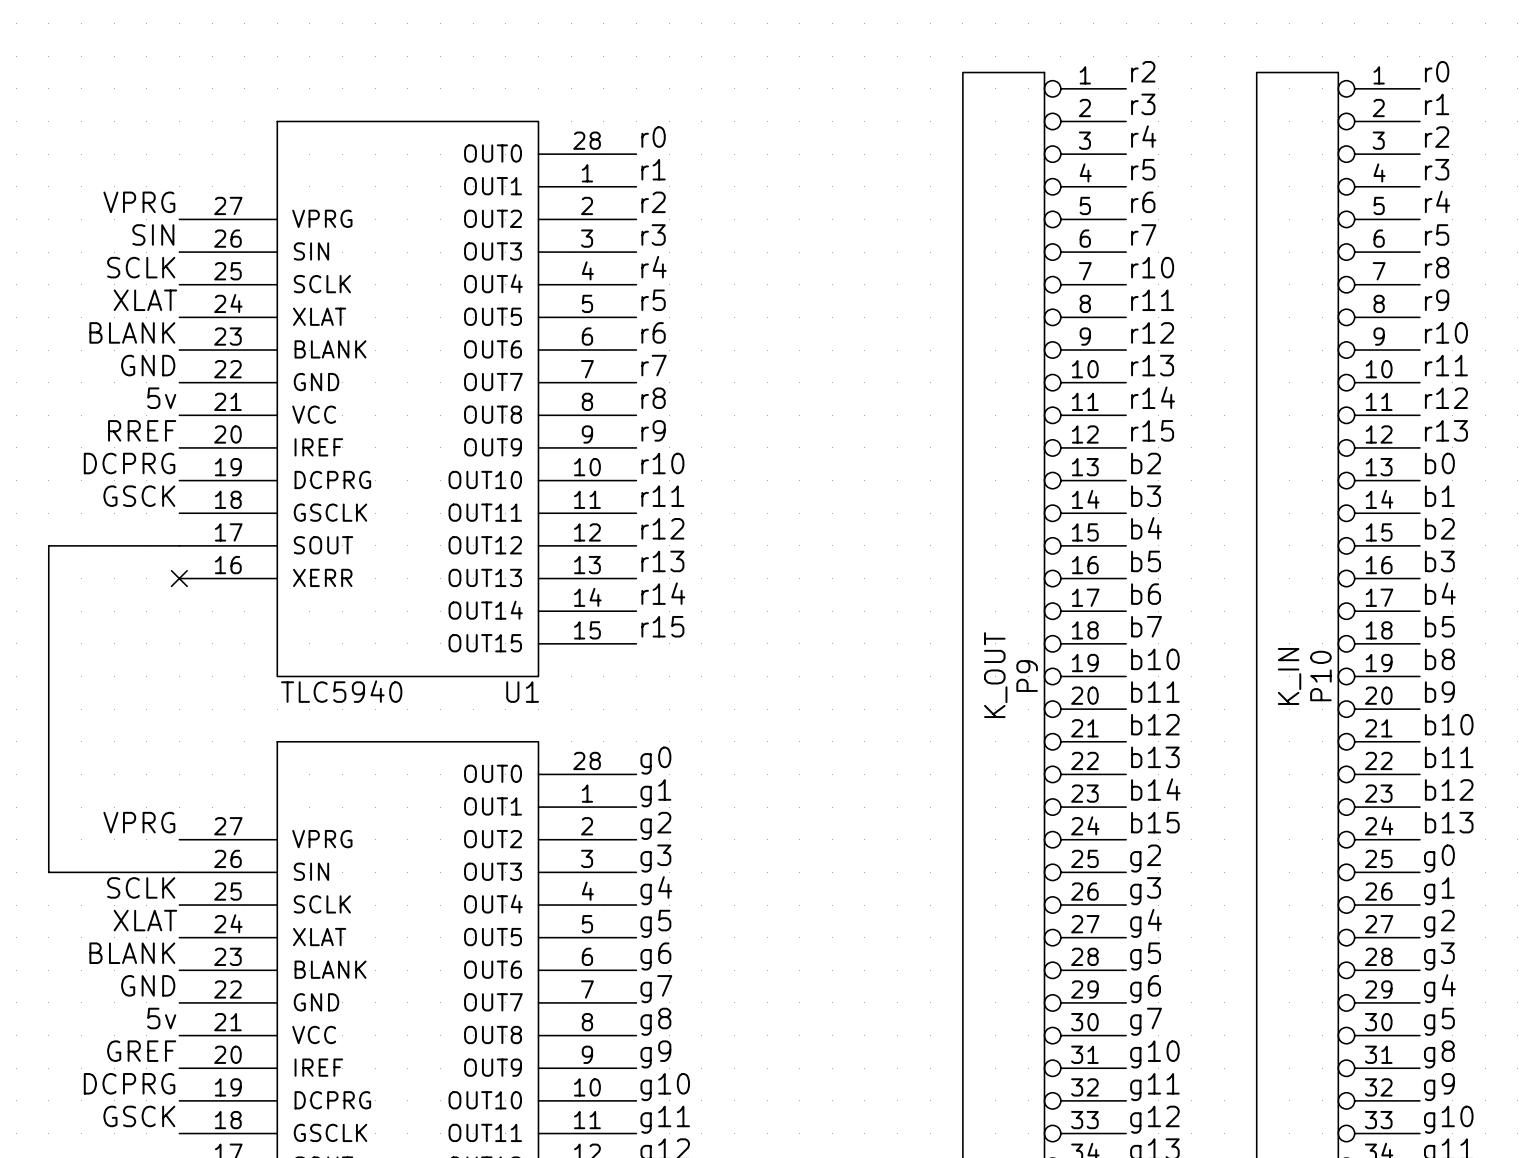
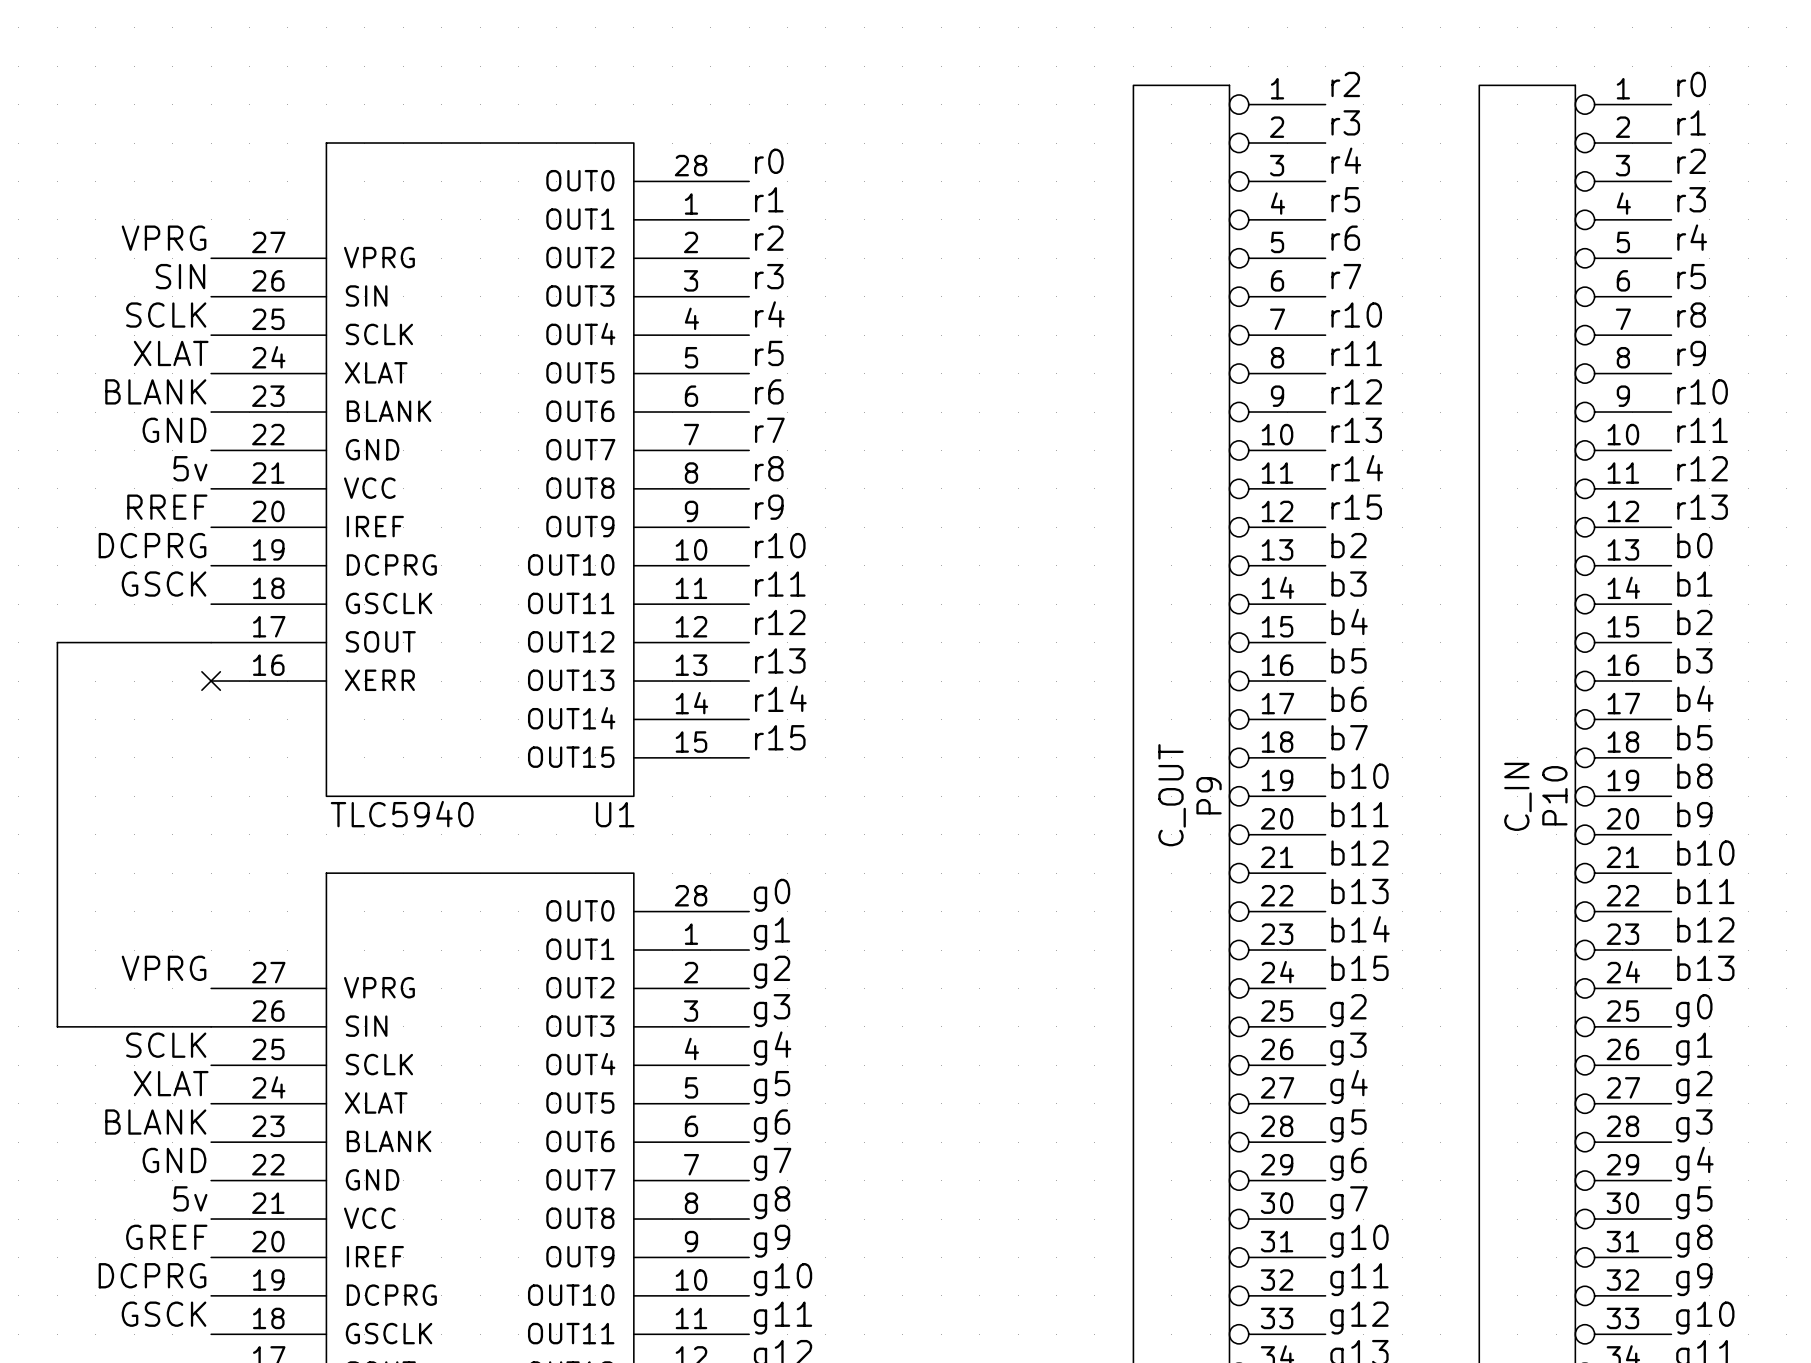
P9 value: K_OUT (995, 675) -> C_OUT (1172, 795)
P10 value: K_IN (1289, 676) -> C_IN (1517, 796)

